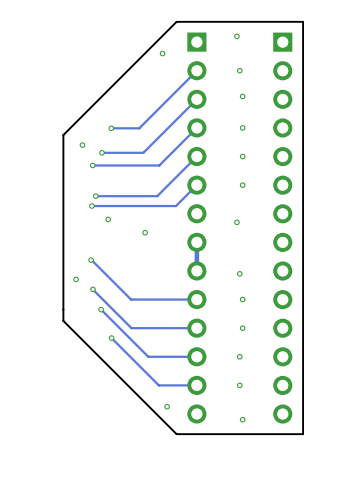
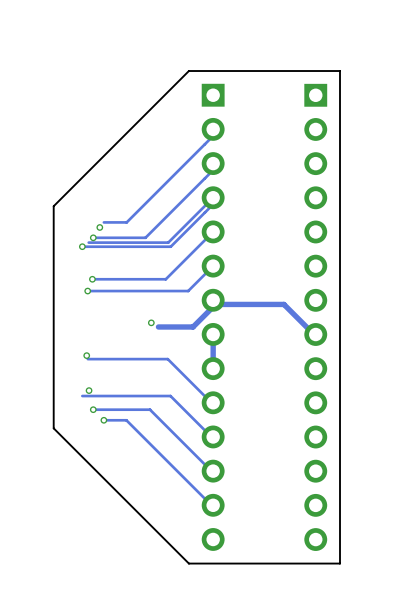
via: (236, 36) -> none
via: (162, 53) -> none
track: (196, 70) (139, 128) (111, 128) -> none
via: (239, 70) -> none
track: none -> (215, 133) (126, 222) (103, 222)
via: (242, 96) -> none
track: (196, 99) (143, 152) (102, 152) -> none
track: none -> (215, 167) (145, 237) (93, 237)
via: (242, 127) -> none
via: (111, 128) -> none
track: none -> (215, 201) (170, 246) (82, 246)
via: (82, 145) -> none
via: (242, 156) -> none
via: none -> (93, 237)
via: (92, 165) -> none
via: none -> (82, 246)
via: (242, 185) -> none
via: (108, 219) -> none
via: (236, 222) -> none
track: none -> (158, 326) (193, 326) (215, 304) (283, 304) (318, 338)
track: (91, 260) (131, 299) (196, 299) -> none
track: none -> (87, 359) (167, 359) (215, 406)
via: (239, 273) -> none
via: (76, 279) -> none
track: (92, 289) (131, 328) (196, 328) -> none
track: none -> (82, 396) (170, 396) (215, 441)
via: (242, 299) -> none
track: none -> (93, 409) (150, 409) (215, 475)
via: none -> (93, 409)
track: (101, 309) (148, 356) (196, 356) -> none
via: (101, 309) -> none
track: none -> (103, 420) (126, 420) (215, 509)
via: none -> (103, 420)
via: (242, 328) -> none
track: (111, 338) (158, 385) (196, 385) -> none
via: (111, 338) -> none
via: (239, 356) -> none
via: (239, 385) -> none
via: (167, 406) -> none
via: (242, 419) -> none

